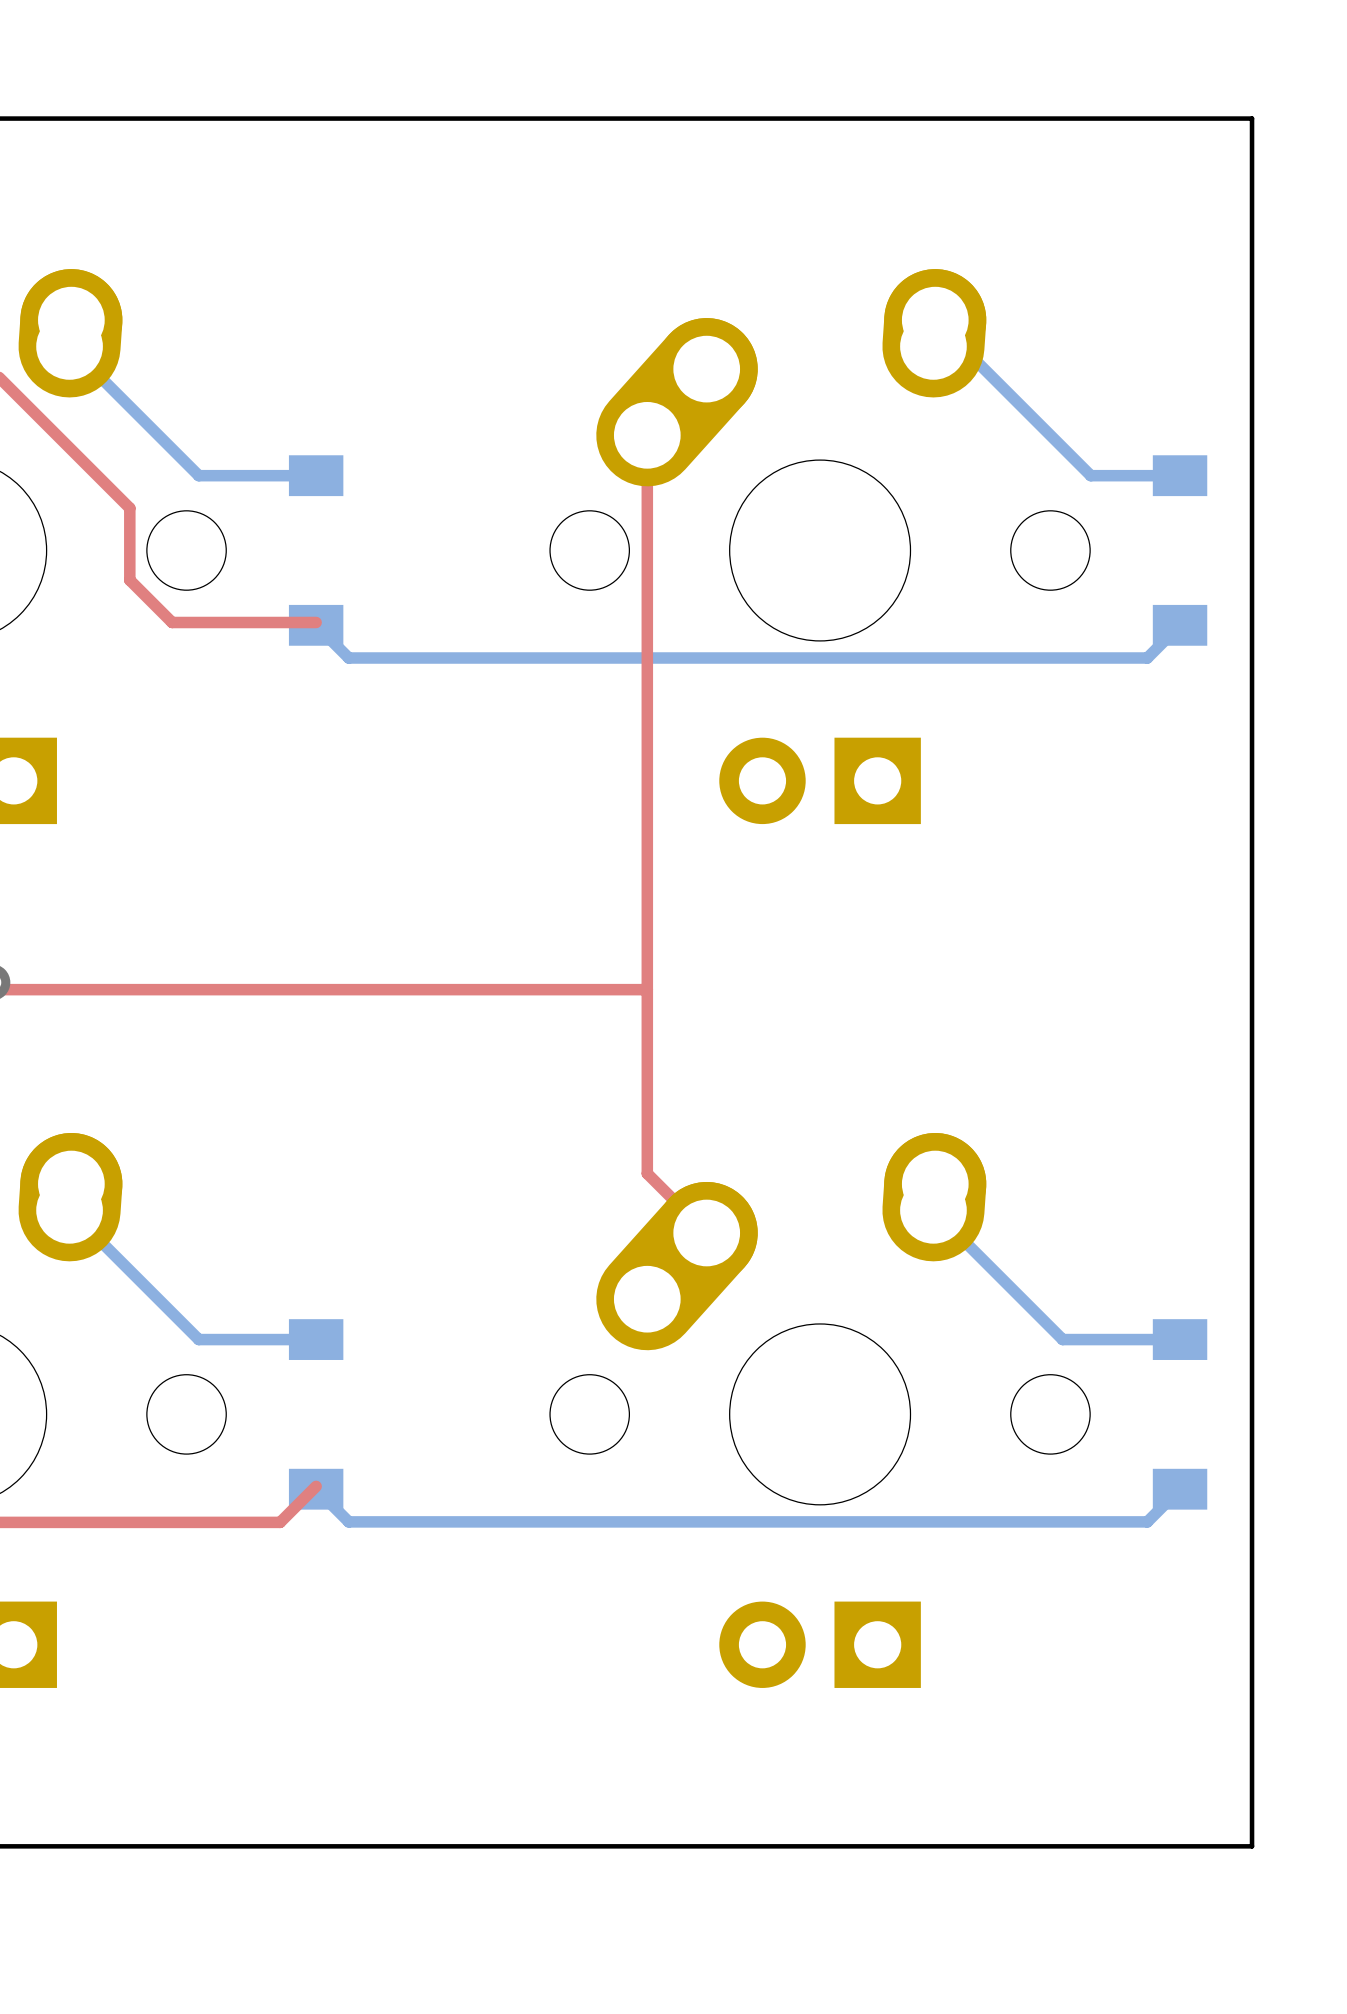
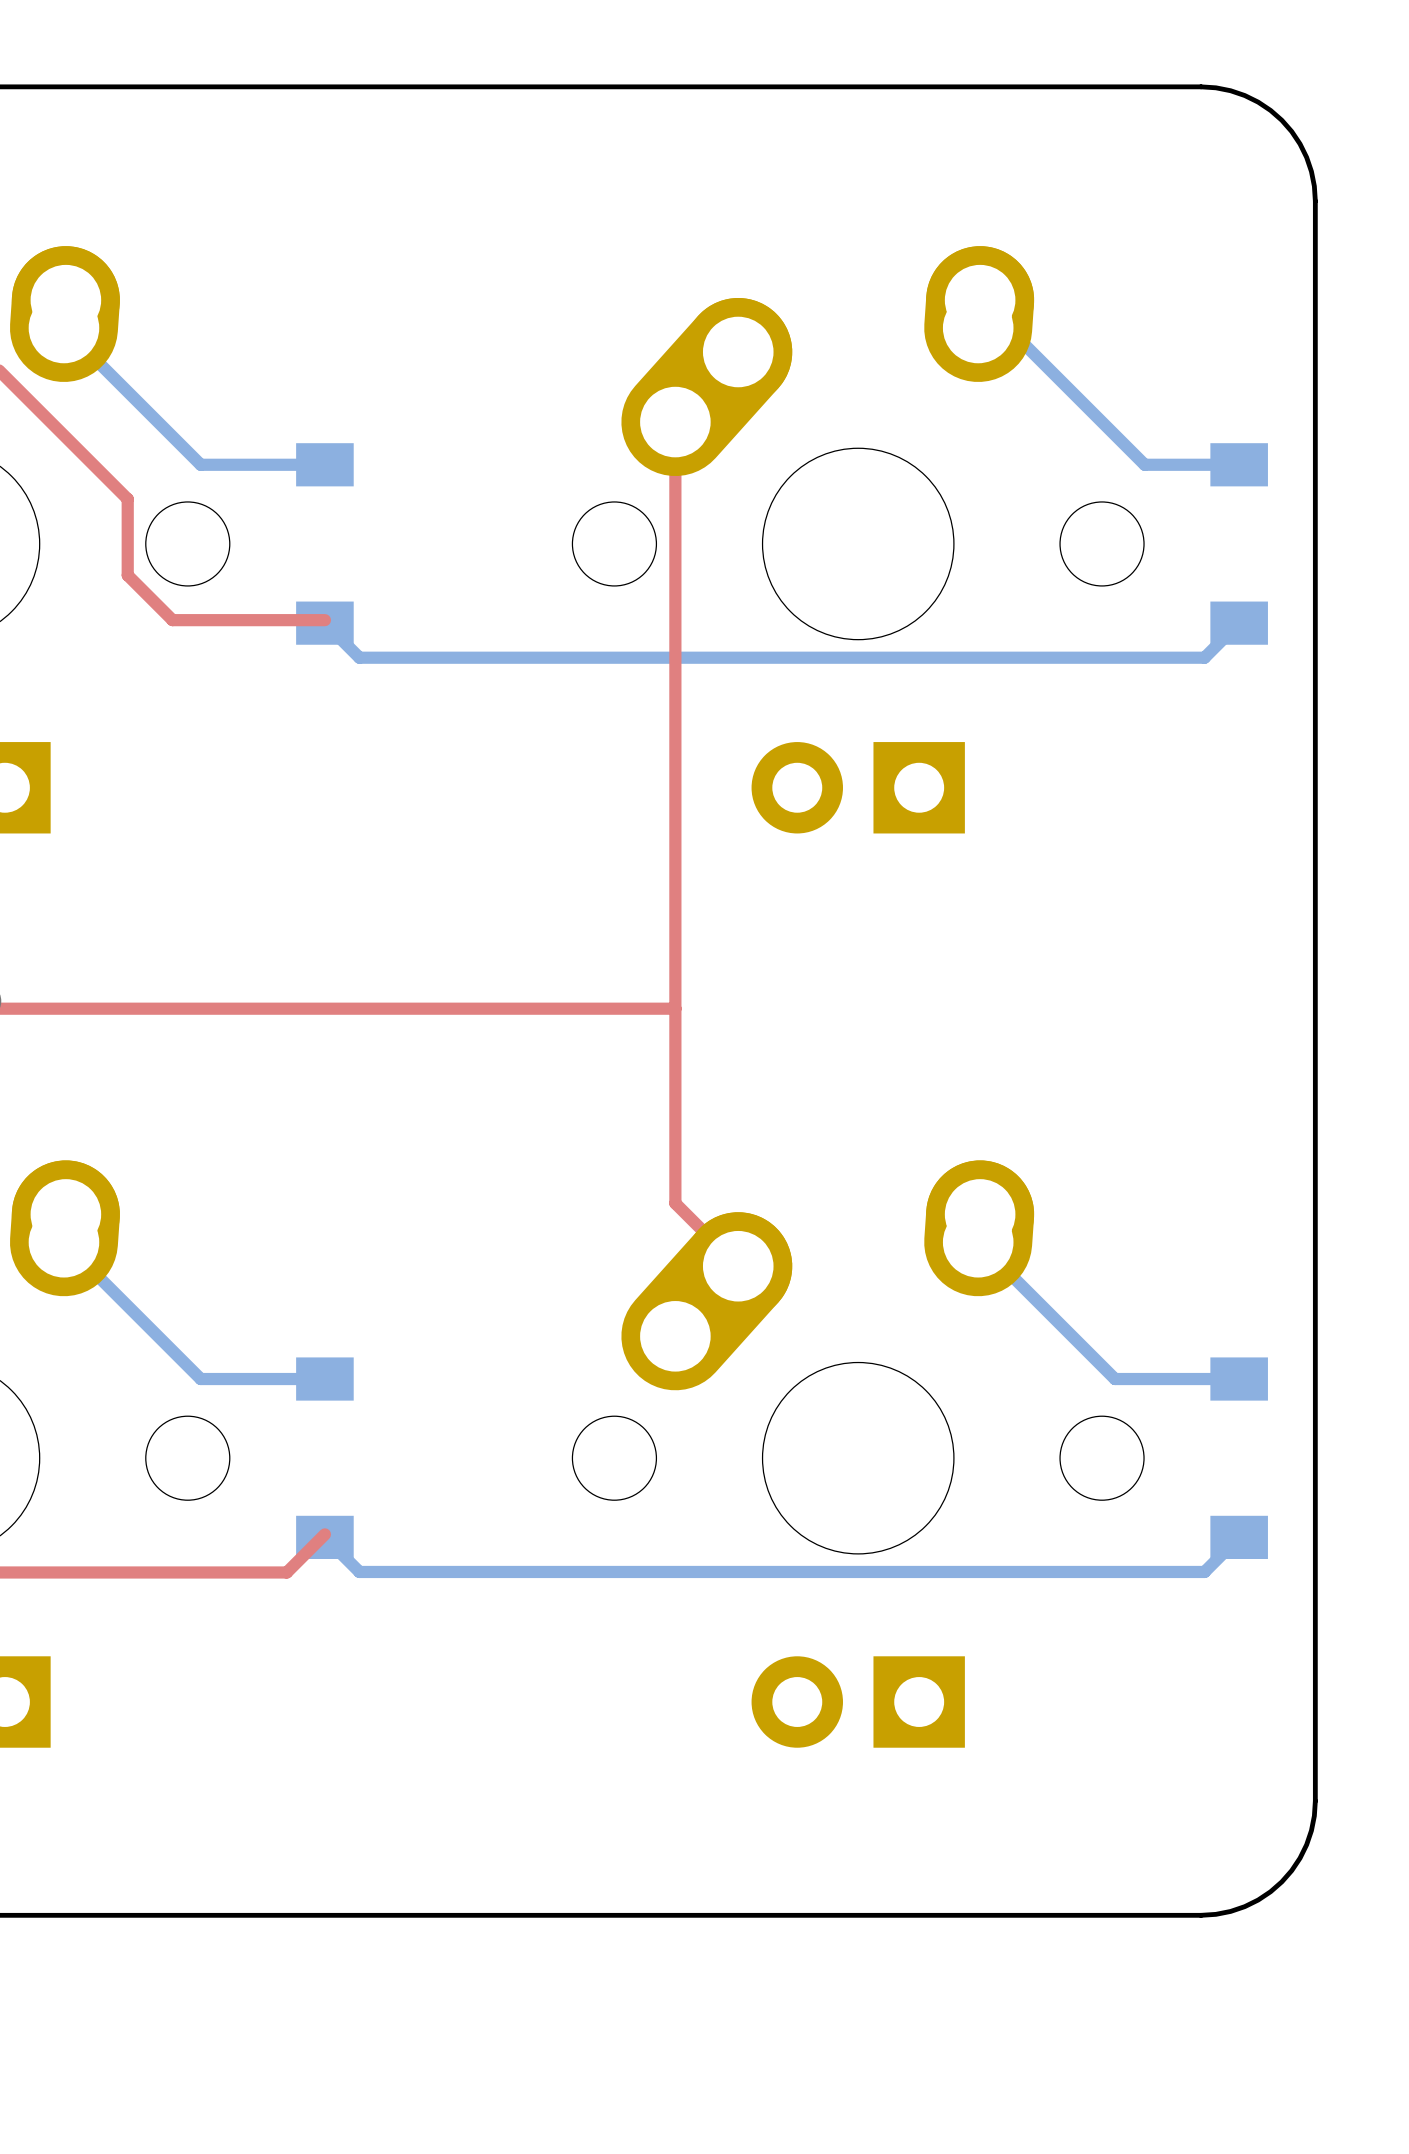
board edge: (1144, 118) (1252, 118) (1252, 226) -> (1201, 86) (1215, 87) (1244, 95) (1258, 102) (1281, 120) (1300, 143) (1306, 157) (1311, 171) (1315, 201)
board edge: (1252, 1738) (1252, 1846) (1144, 1846) -> (1315, 1801) (1311, 1830) (1306, 1844) (1300, 1858) (1281, 1881) (1258, 1900) (1244, 1906) (1230, 1911) (1201, 1915)

